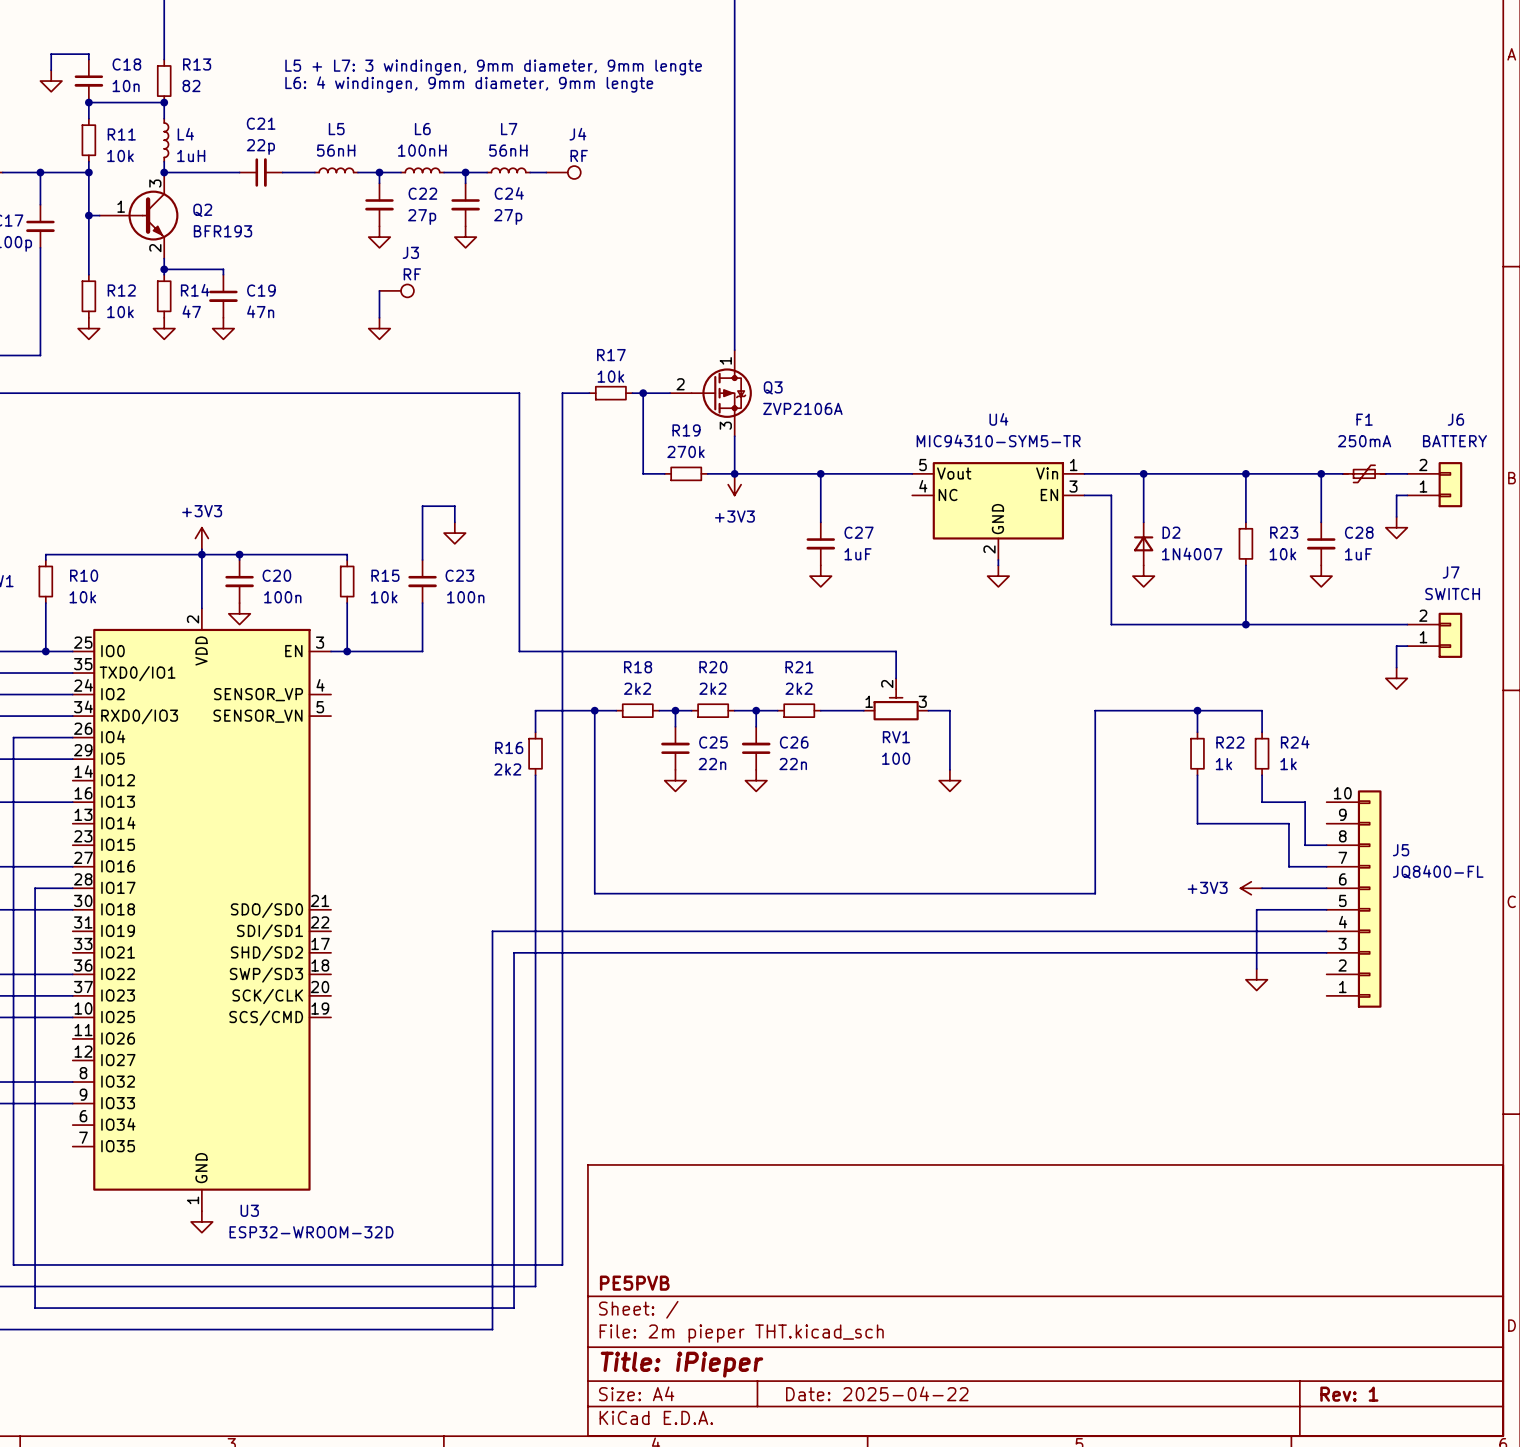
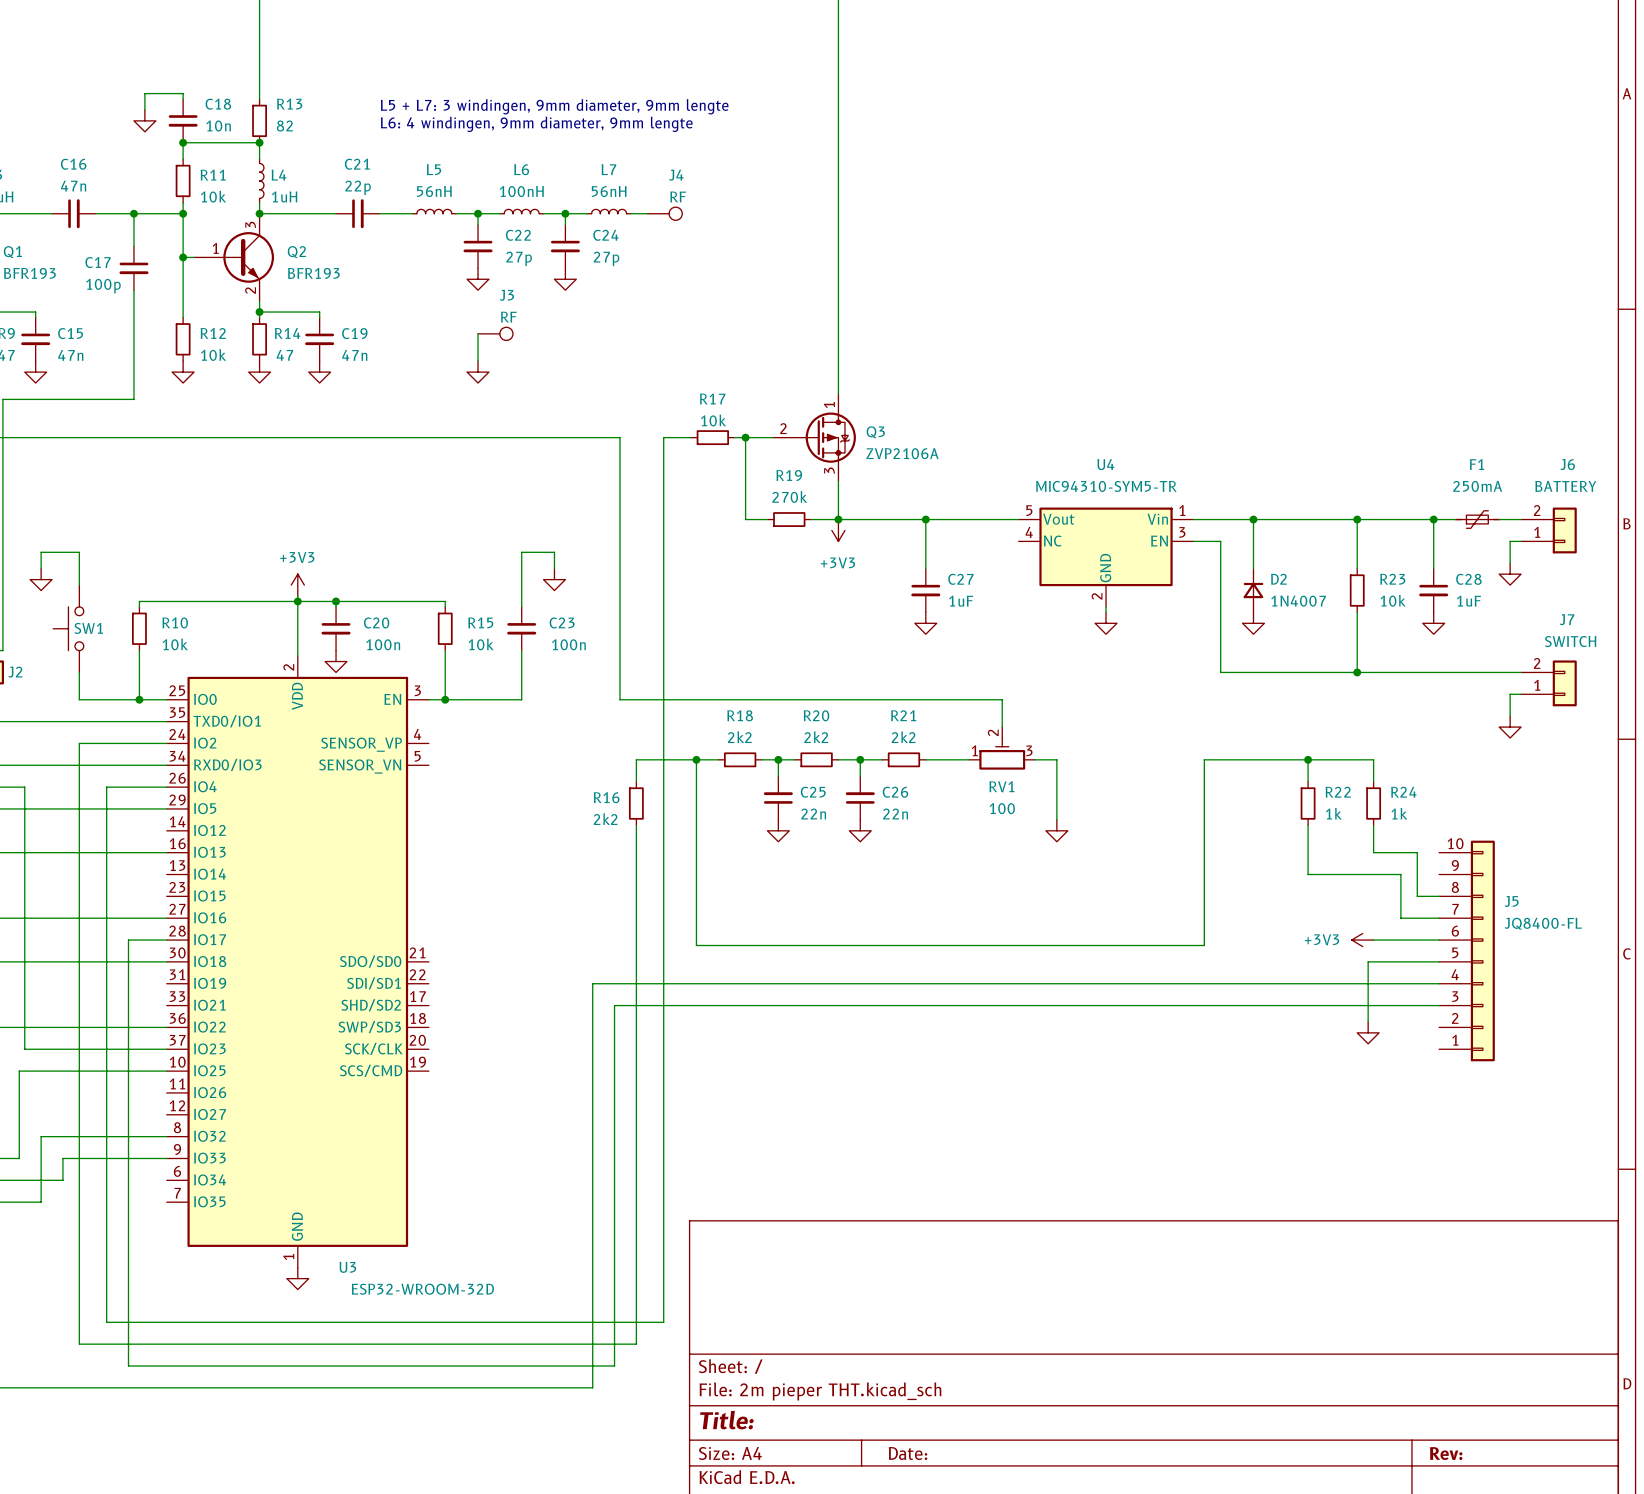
title block: PE5PVB (634, 1283) -> none
title block: Title: iPieper (681, 1364) -> Title: (726, 1420)
title block: Date: 2025-04-22 (877, 1393) -> Date: (908, 1453)
title block: Rev: 1 (1349, 1394) -> Rev: (1446, 1453)

